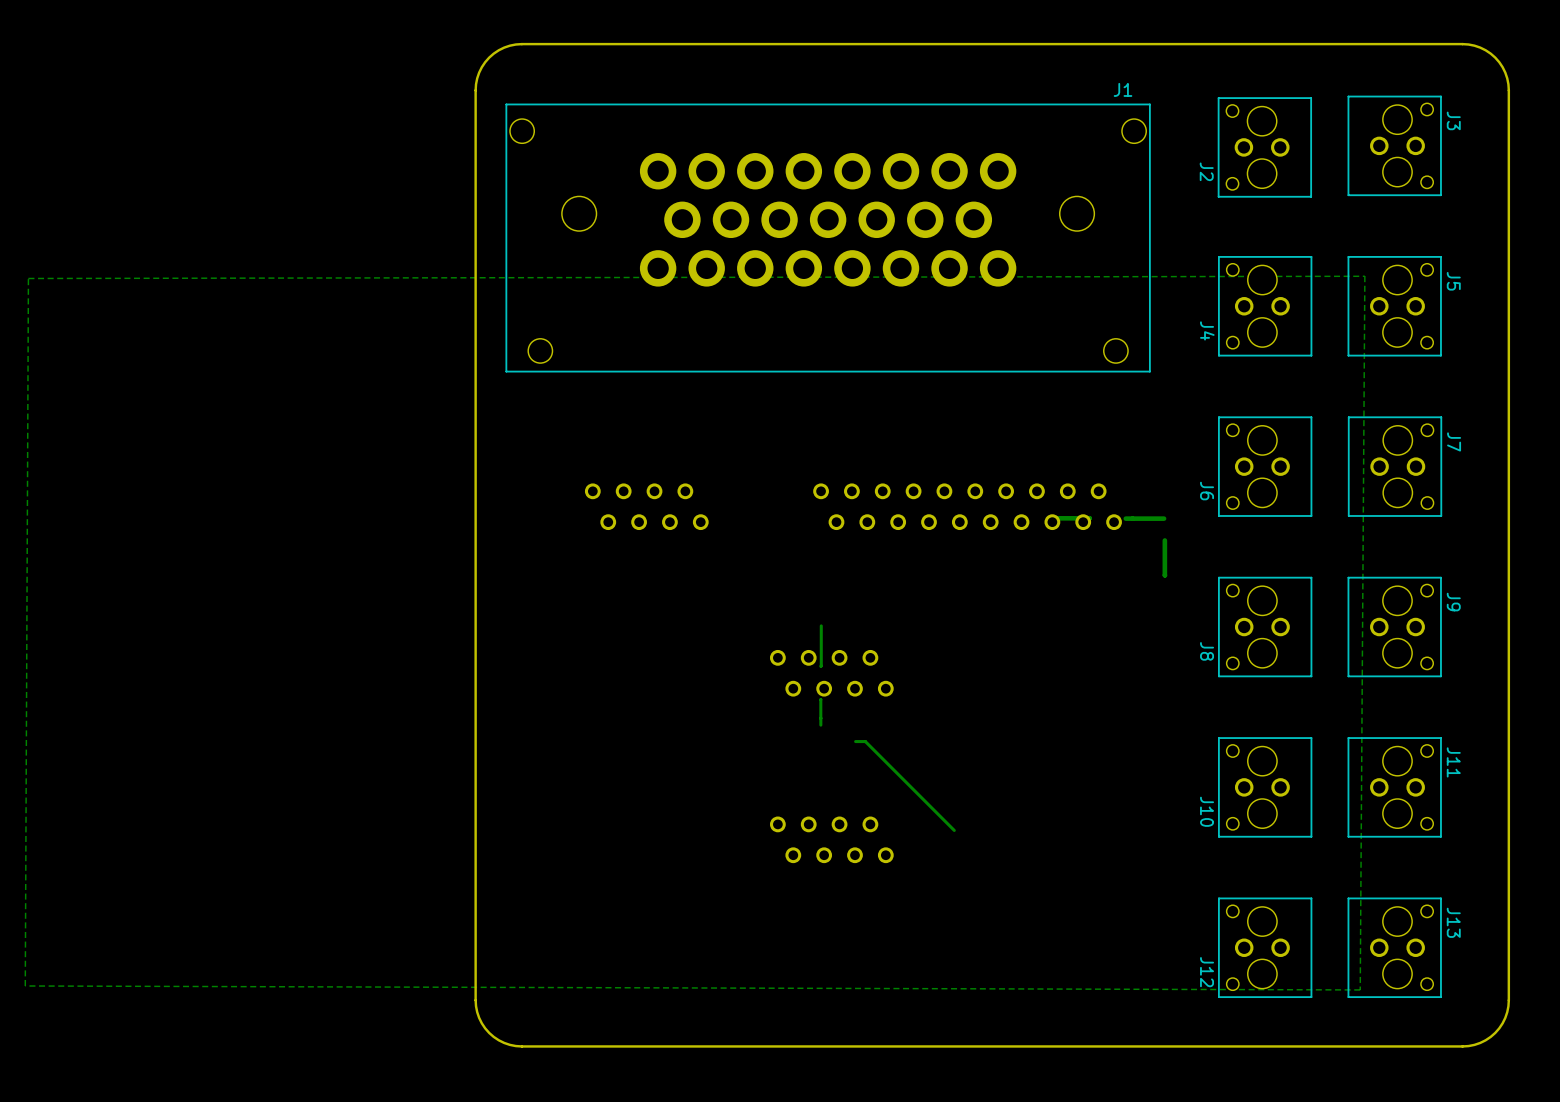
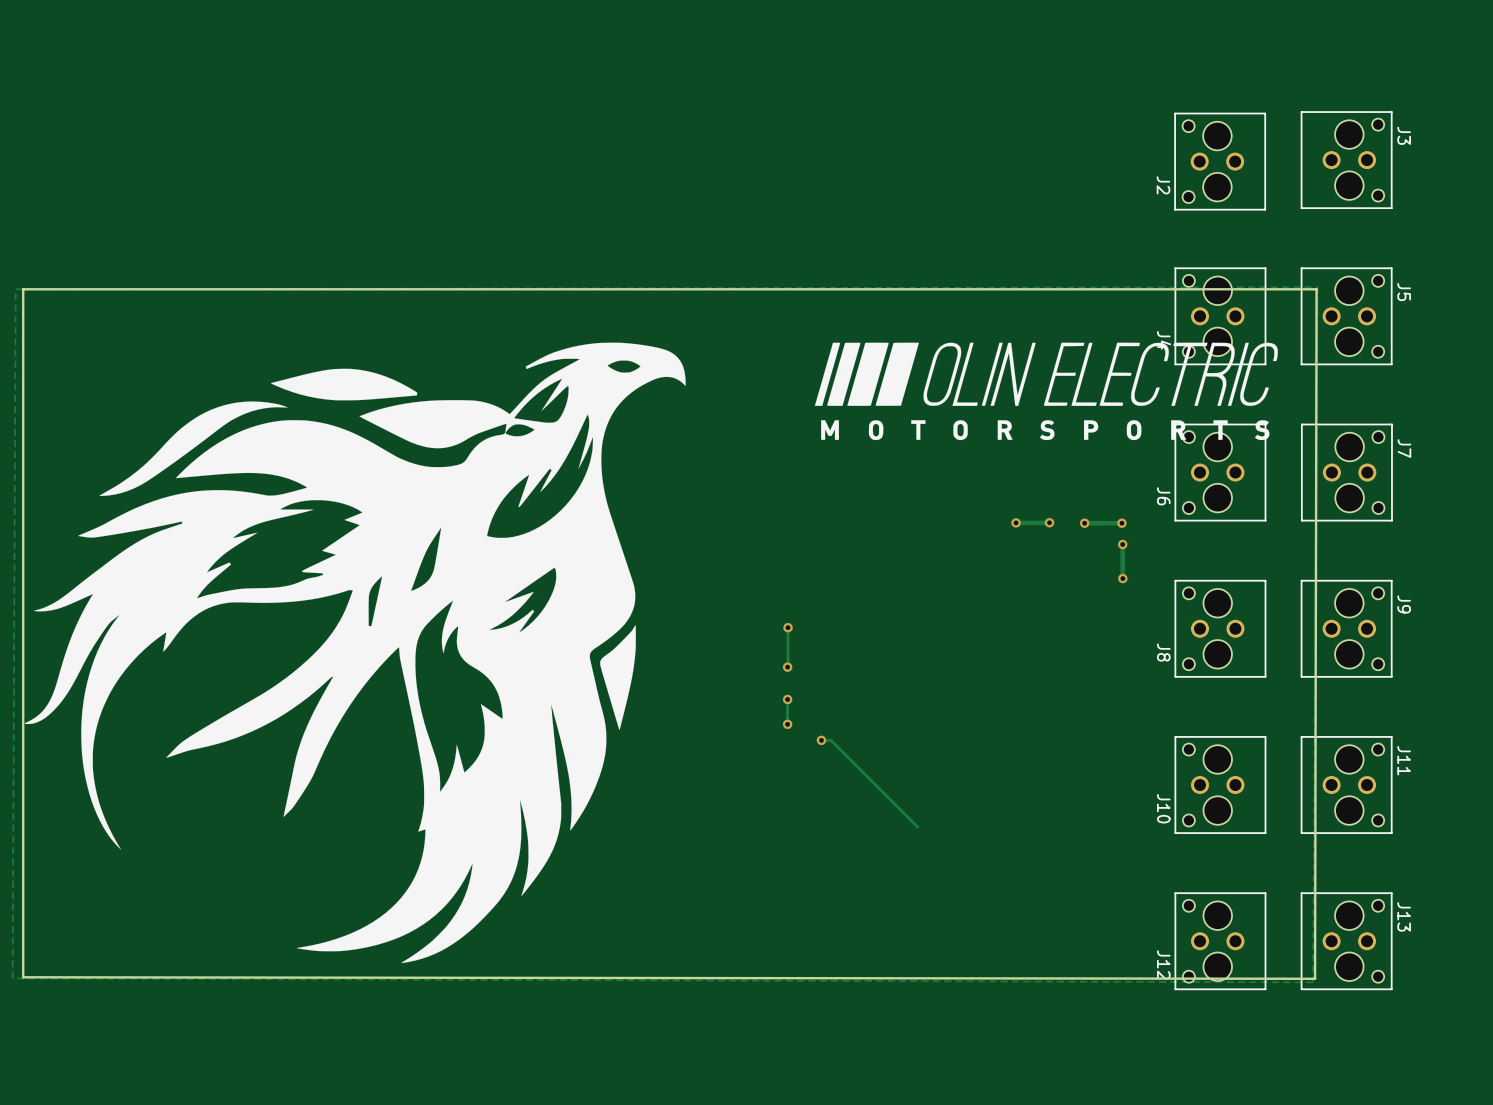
board edge: (1462, 44) (521, 44) (504, 47) (489, 57) (479, 72) (475, 90) (475, 1000) (479, 1017) (489, 1032) (504, 1042) (521, 1046) (1462, 1046) (1480, 1042) (1495, 1032) (1505, 1017) (1508, 1000) (1508, 90) (1505, 72) (1495, 57) (1480, 47) (1474, 45) (1468, 44) (1462, 44) -> none
J1: (828, 238) -> none
board edge: none -> (1316, 289) (1315, 978) (23, 977) (23, 289) (1316, 289)
drawing: none -> [24, 342, 686, 964]
drawing: none -> [814, 342, 1278, 441]
part: (646, 506) -> none
part: (967, 506) -> none
via: none -> (1016, 522)
via: none -> (1049, 522)
via: none -> (1084, 523)
via: none -> (1121, 523)
via: none -> (1122, 544)
via: none -> (1122, 578)
via: none -> (788, 627)
via: none -> (787, 667)
part: (831, 673) -> none
via: none -> (787, 699)
via: none -> (787, 724)
via: none -> (821, 740)
part: (831, 839) -> none

